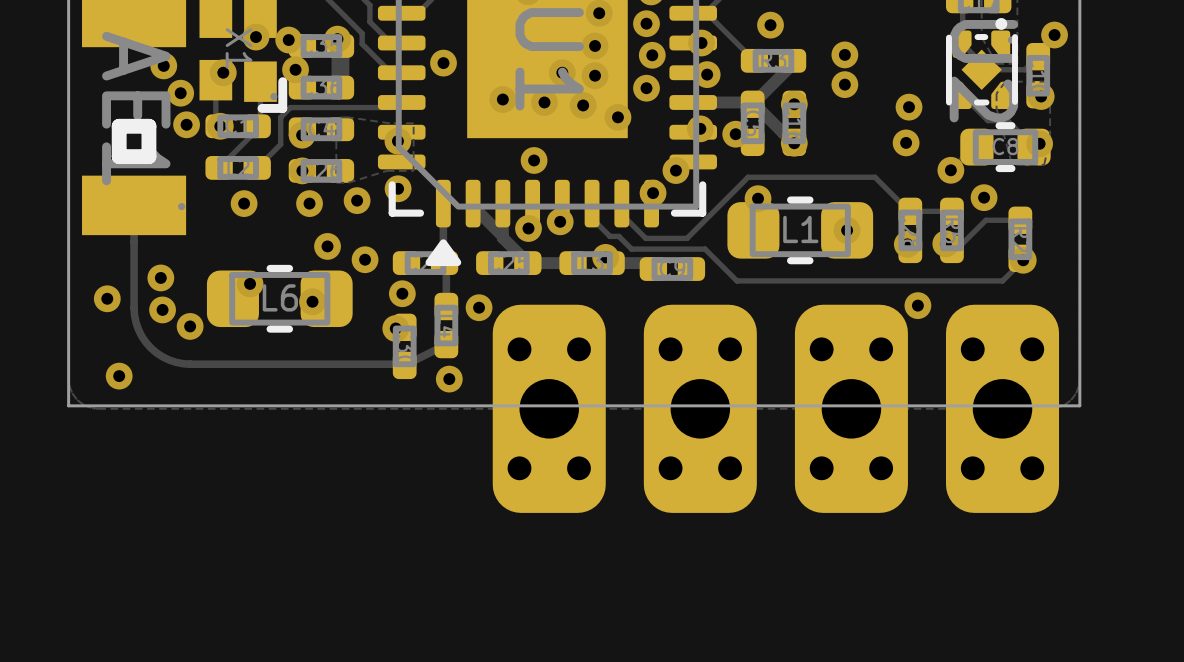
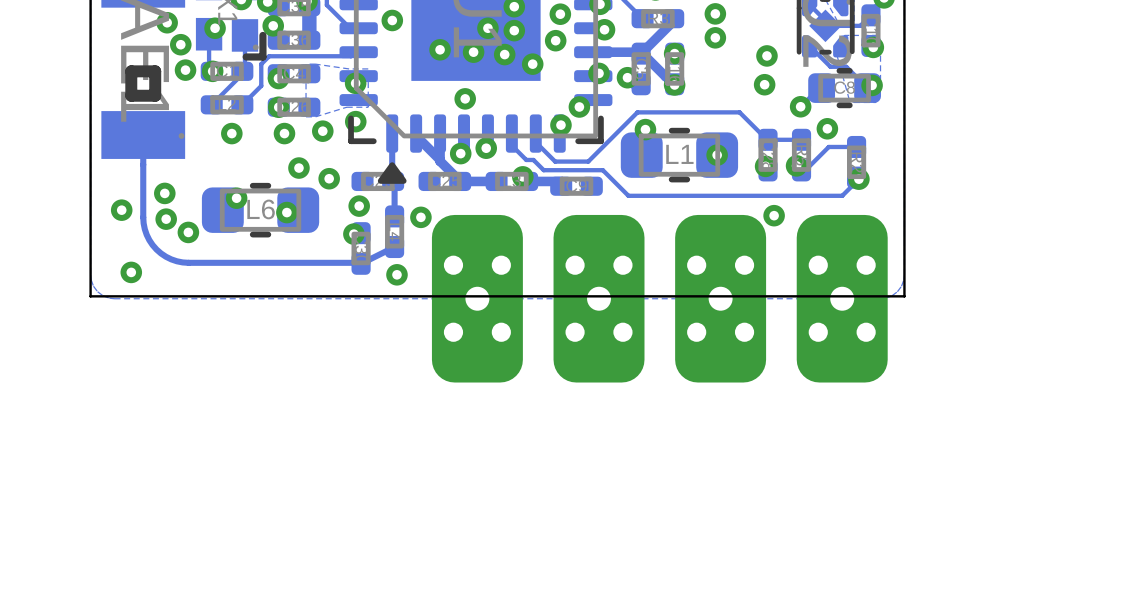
part footprint: [492, 304, 606, 513] -> [431, 214, 523, 383]
part footprint: [643, 304, 757, 513] -> [553, 214, 645, 383]
part footprint: [794, 304, 908, 513] -> [675, 214, 767, 383]
part footprint: [946, 304, 1060, 513] -> [796, 214, 888, 383]

